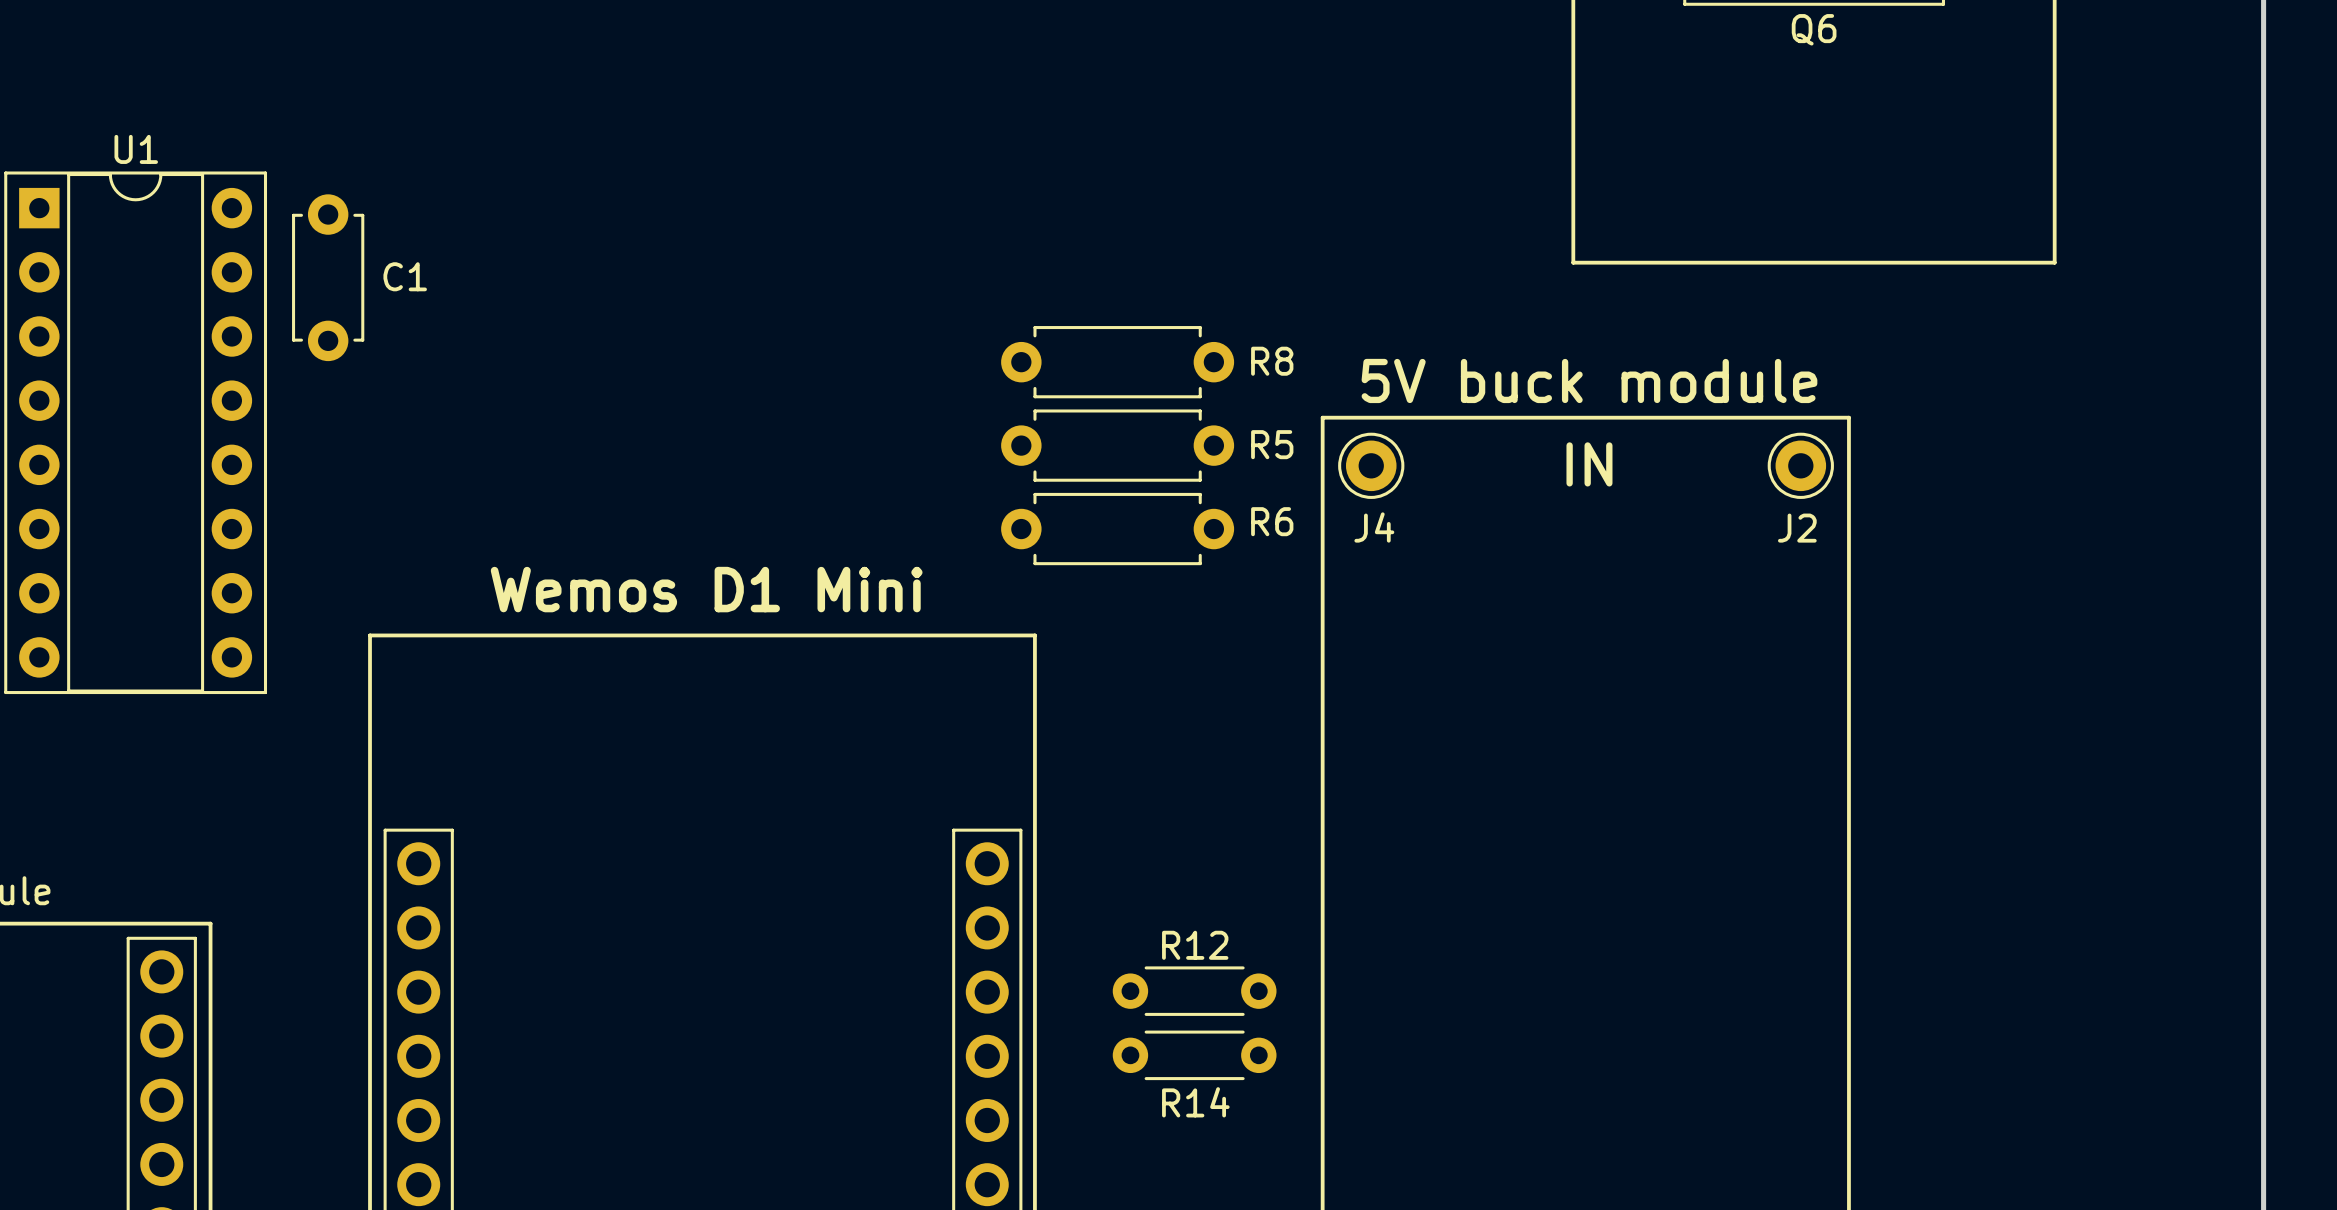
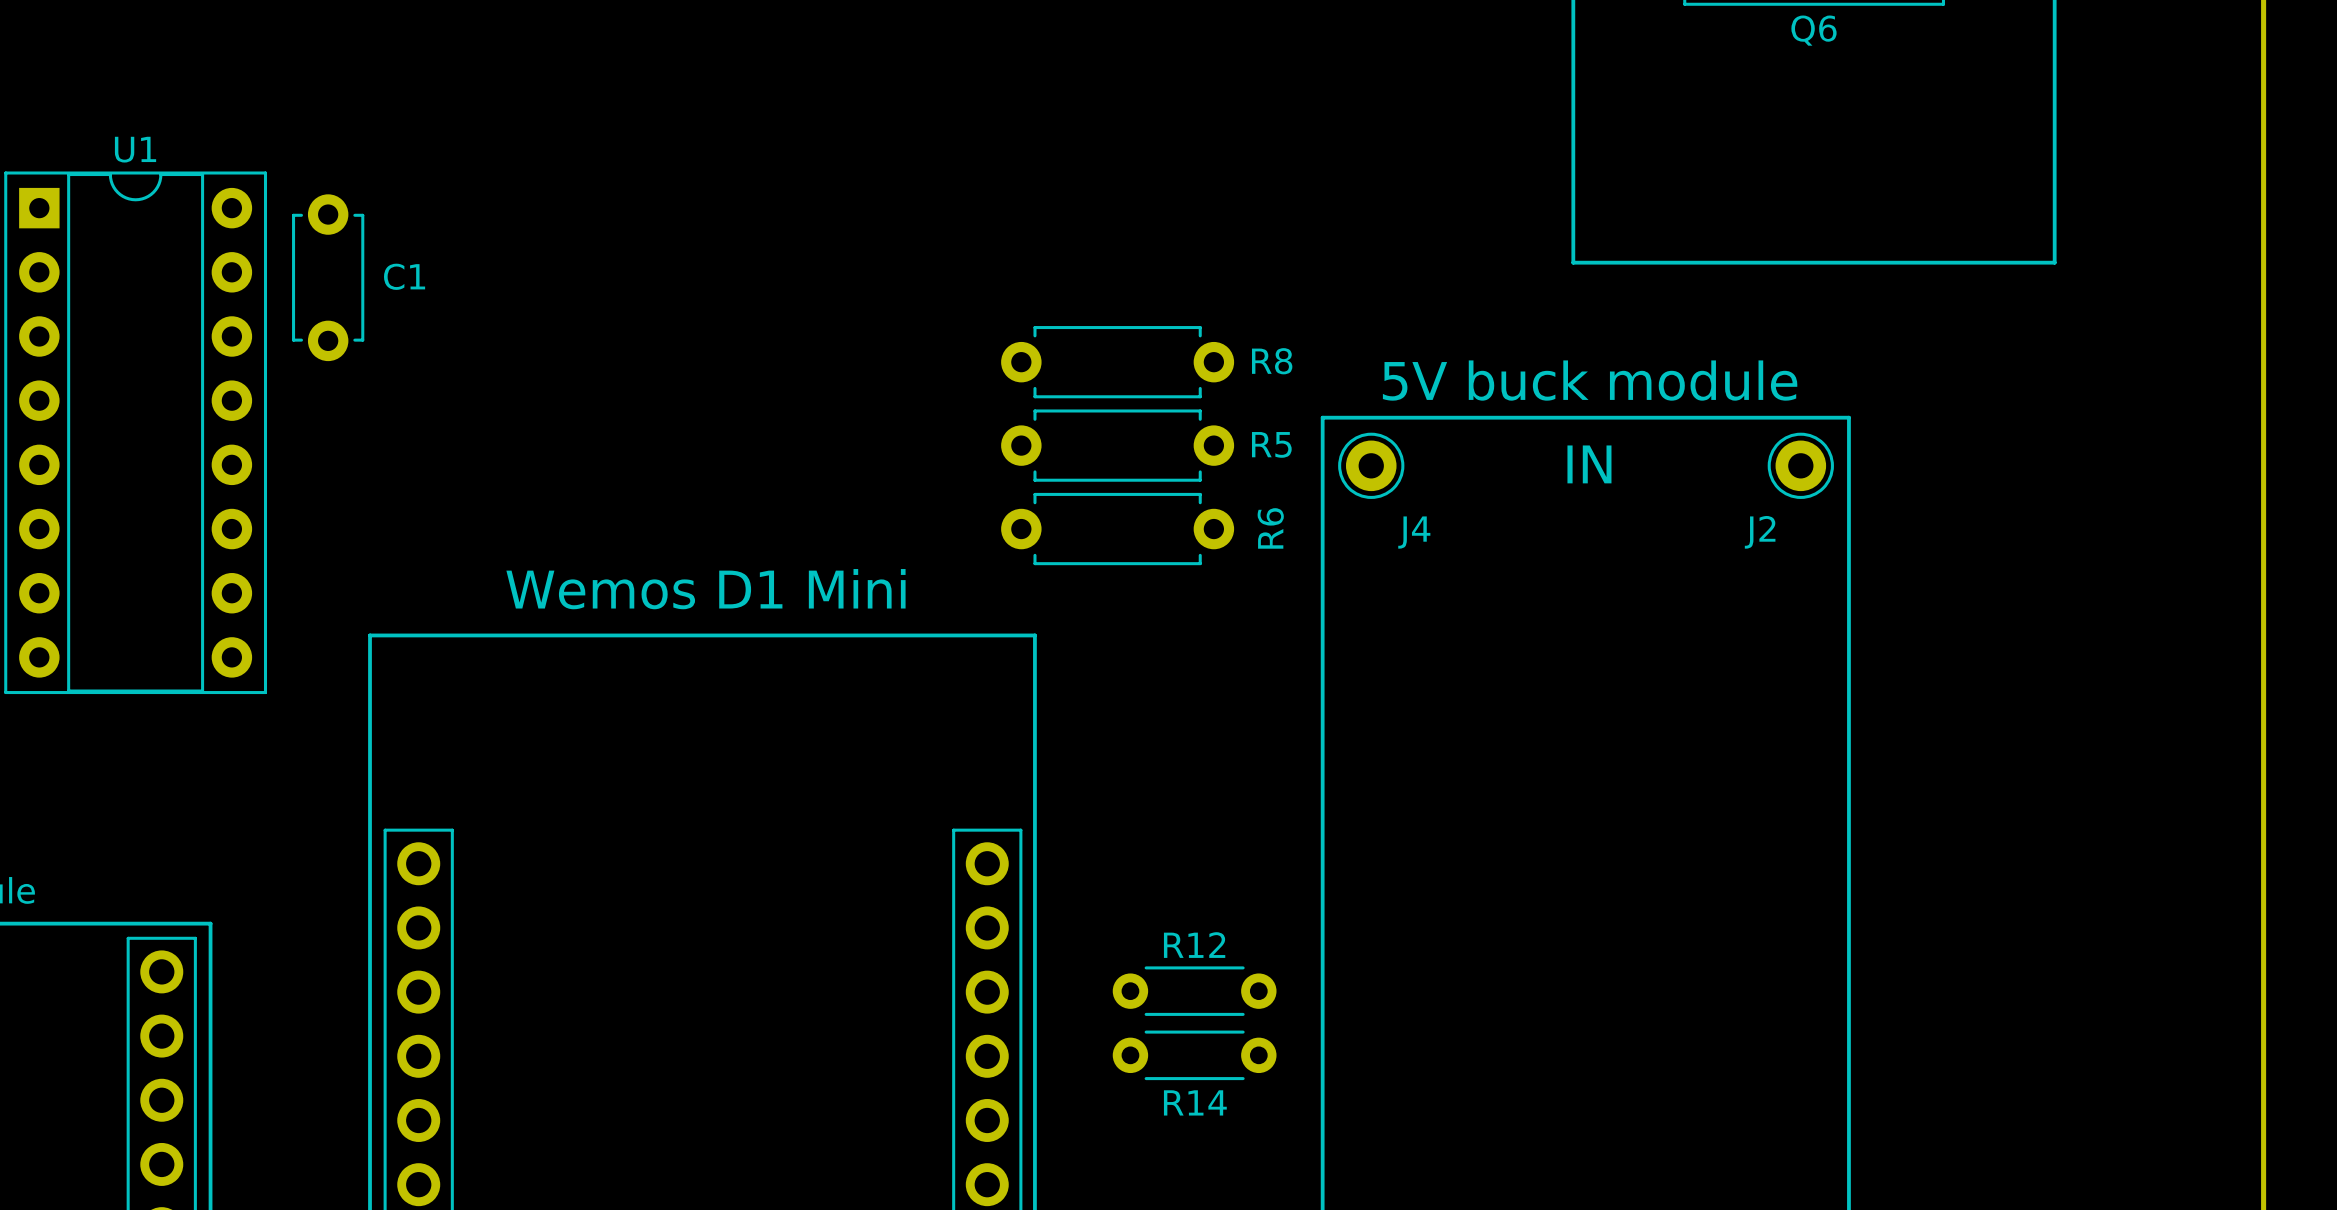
R6 name rotation: 0° (1272, 521) -> 90° counterclockwise (1270, 528)
J4 name position: J4 (1374, 527) -> J4 (1414, 532)
J2 name position: J2 (1797, 528) -> J2 (1760, 532)

